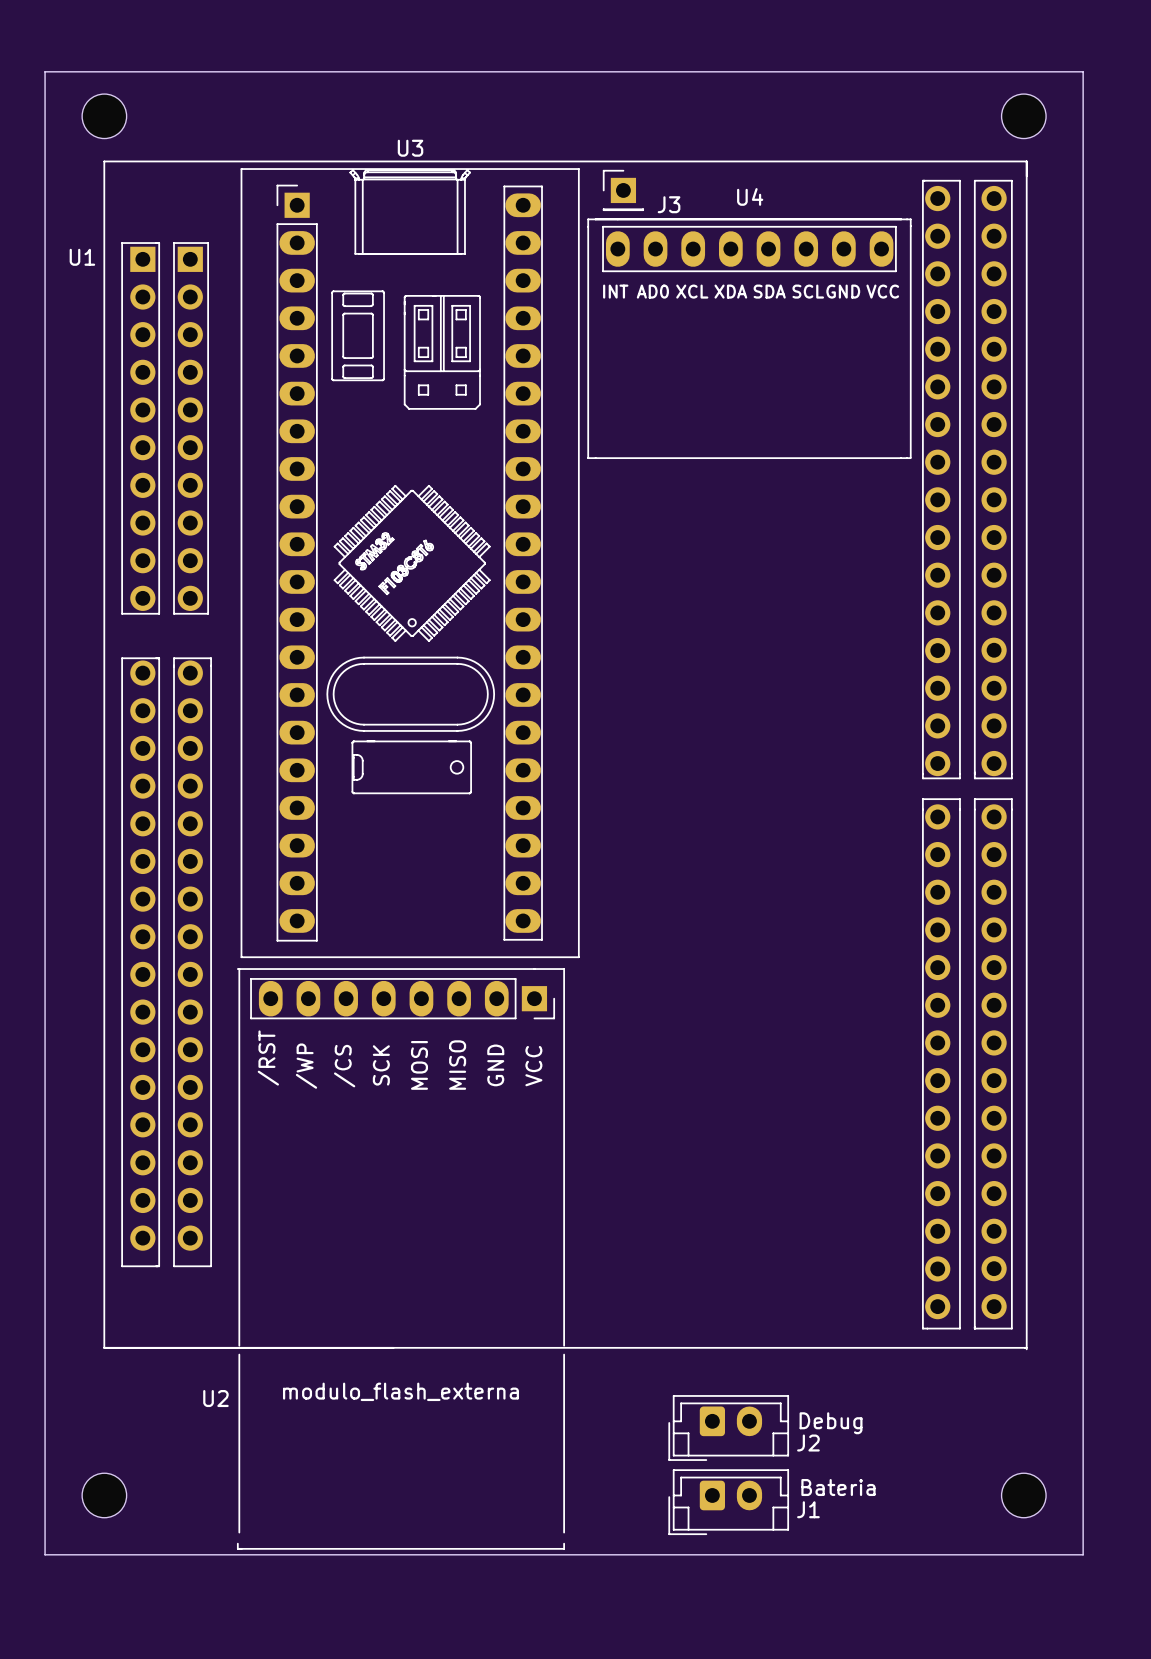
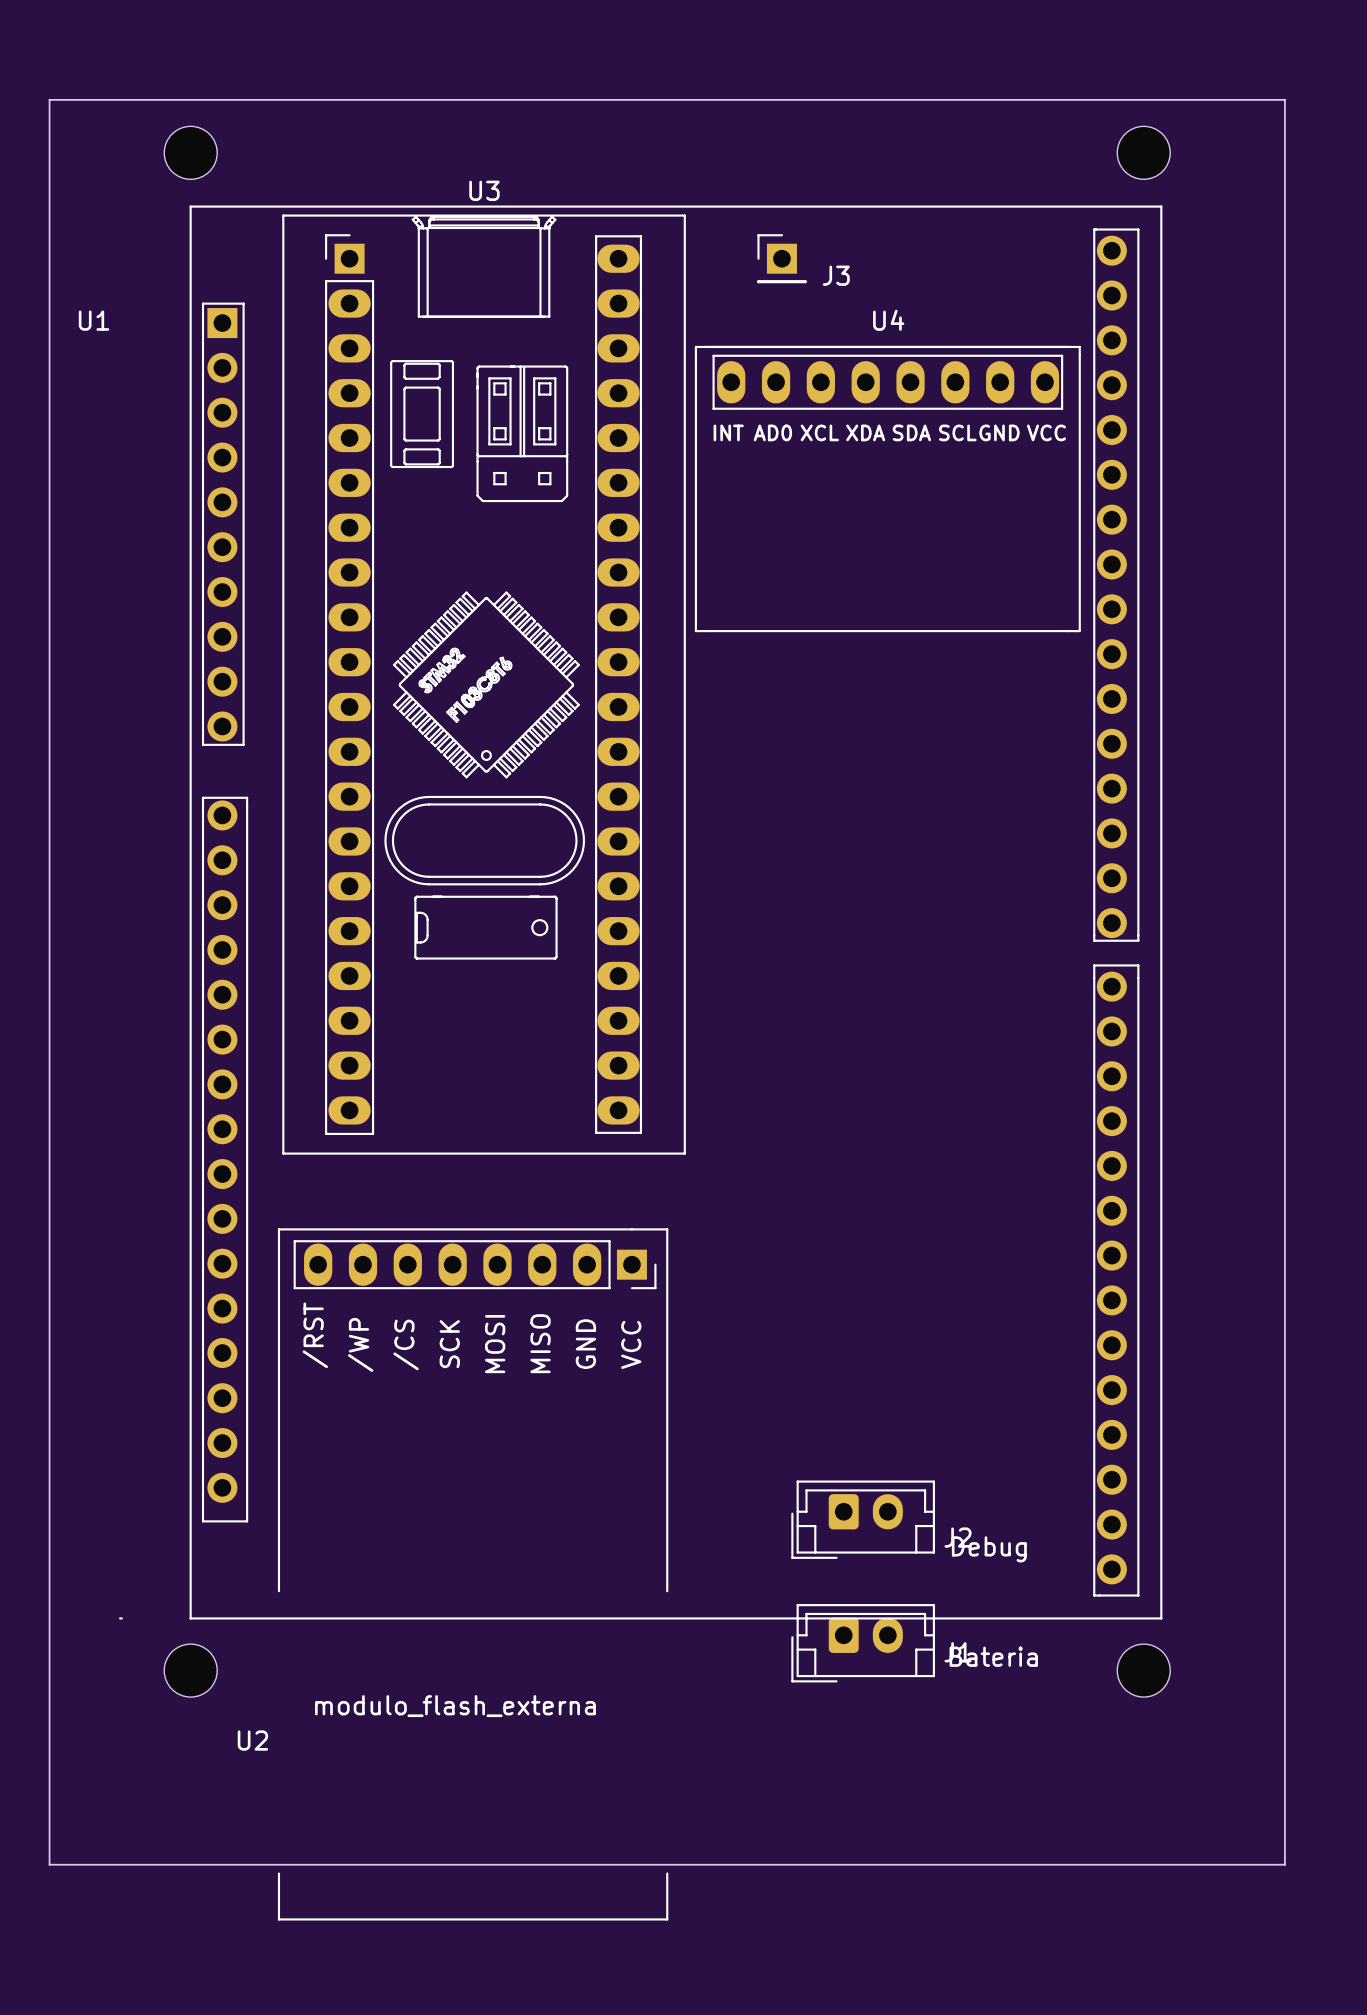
part position: (104, 116) -> (190, 152)
part position: (1023, 116) -> (1143, 152)
U1 footprint: [103, 160, 1028, 1351] -> [119, 205, 1163, 1620]
J3 position: (623, 190) -> (781, 258)
U4 position: (749, 338) -> (887, 489)
U2 footprint: [236, 968, 565, 1550] -> [277, 1228, 669, 1921]
text position: Debug (831, 1423) -> Debug (989, 1549)
J2 position: (728, 1428) -> (863, 1519)
text position: Bateria (838, 1487) -> Bateria (993, 1656)
part position: (104, 1495) -> (190, 1670)
part position: (1023, 1495) -> (1143, 1670)
J1 position: (728, 1502) -> (863, 1643)

